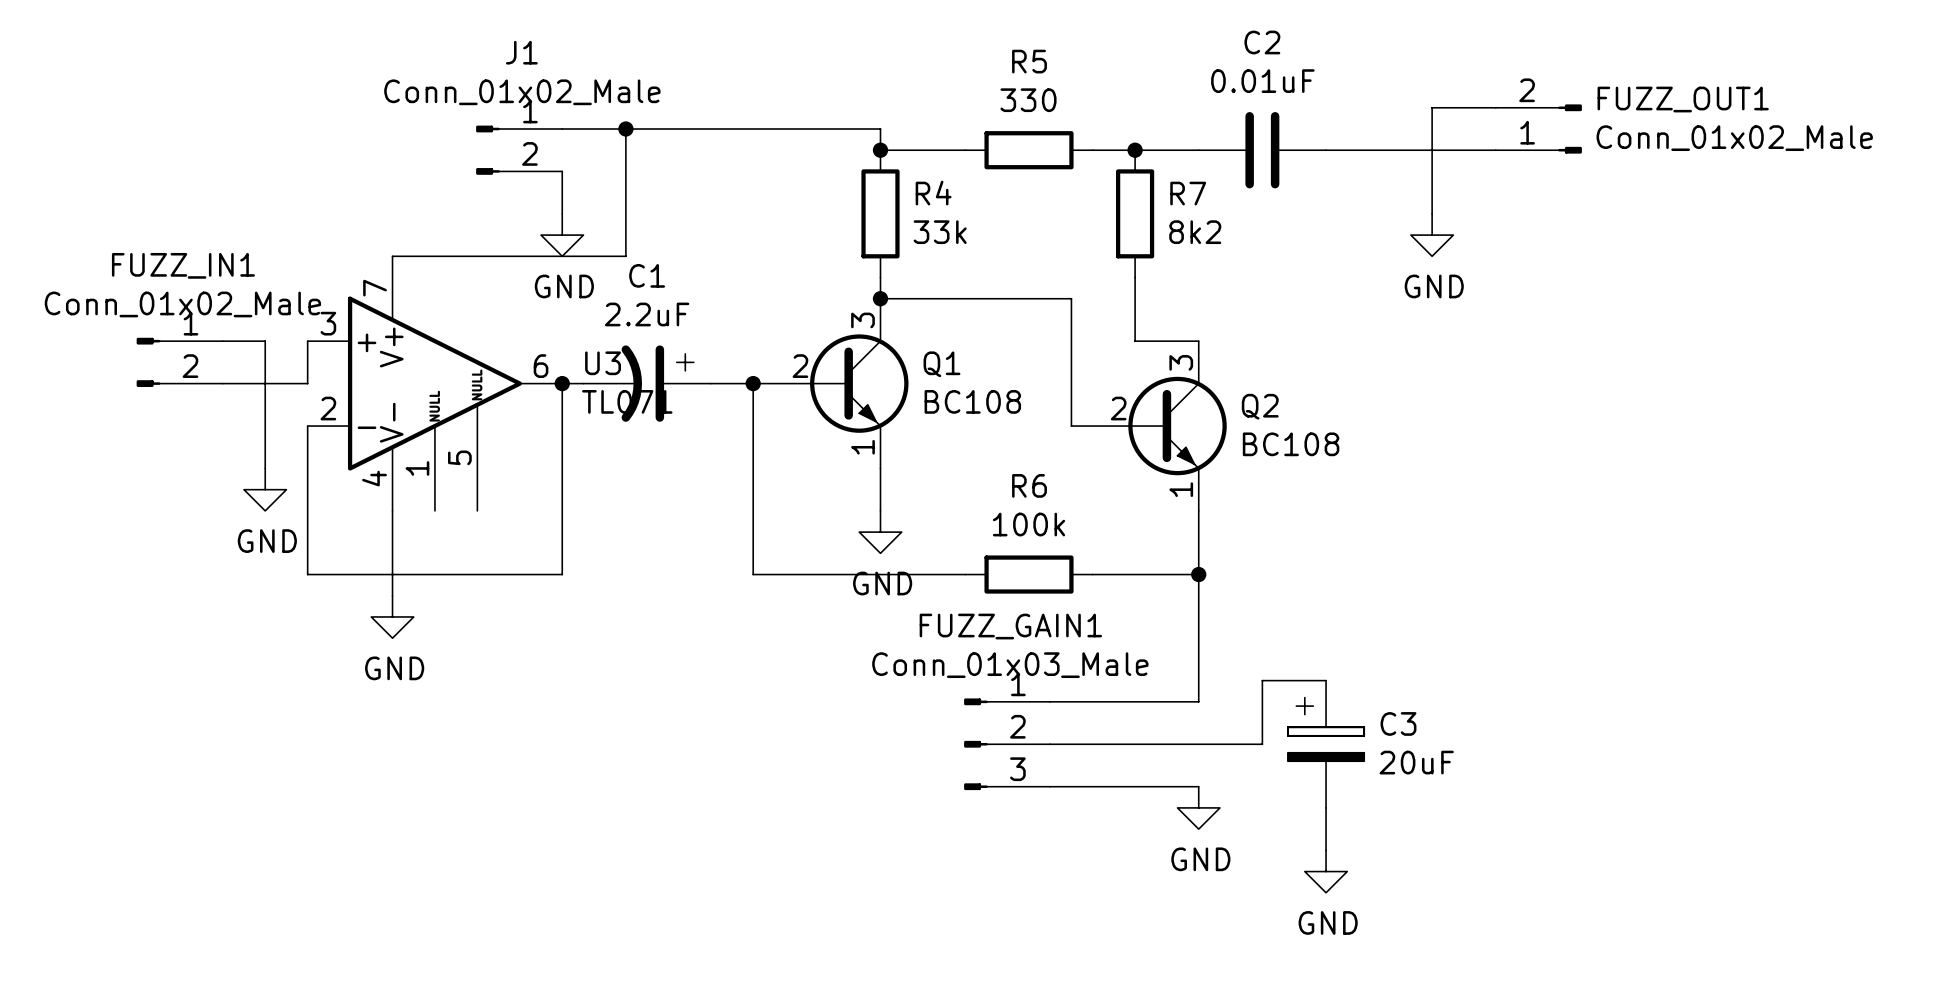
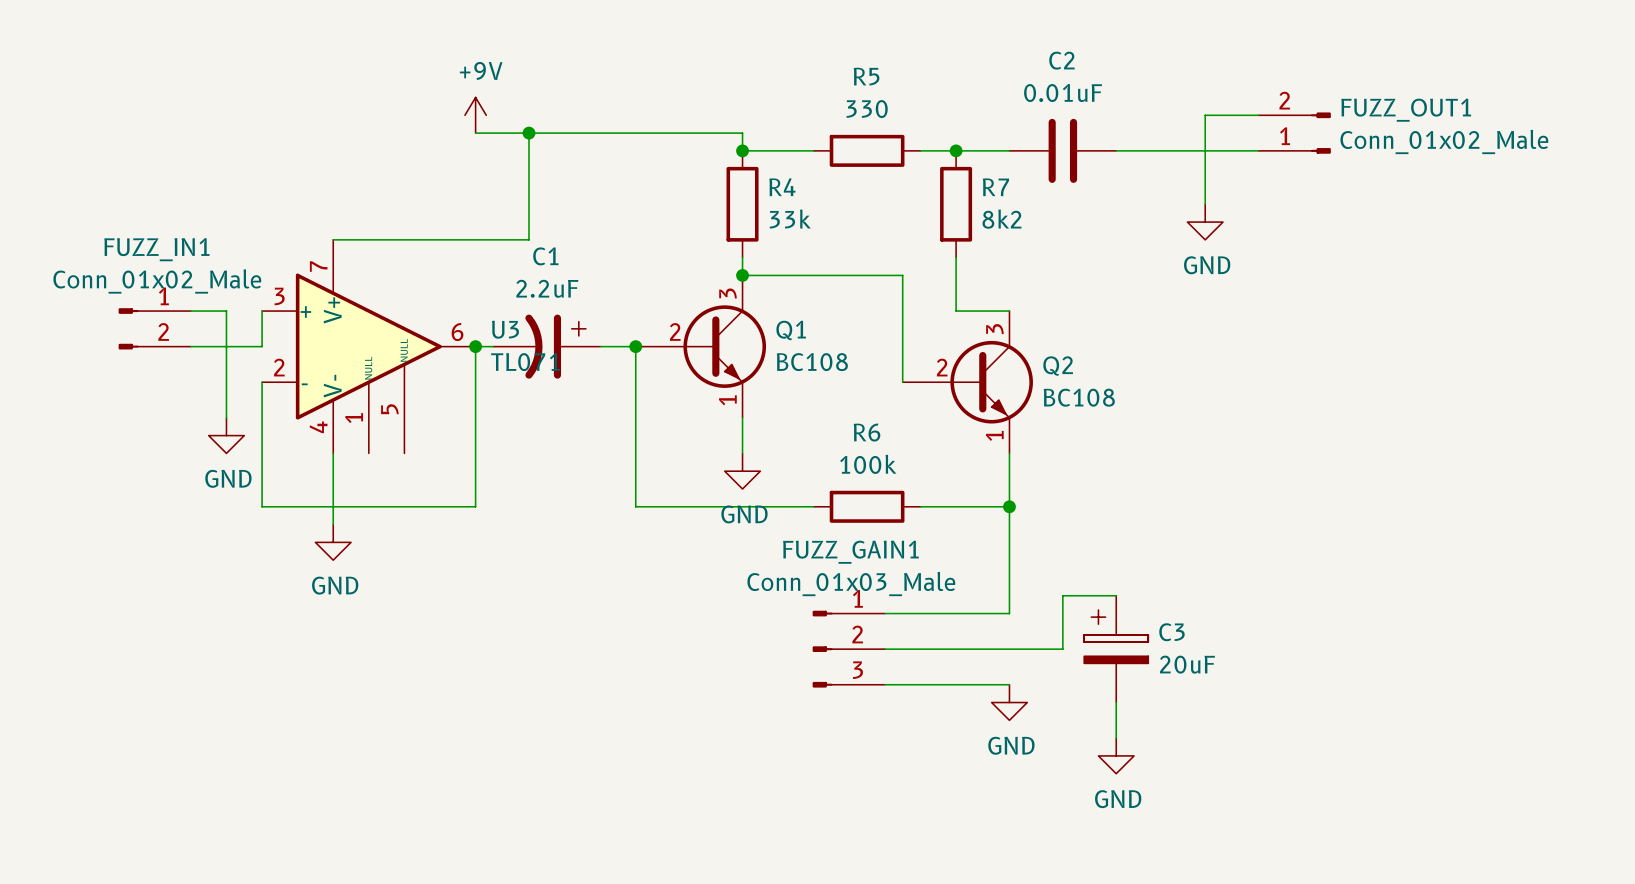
power symbol: none -> +9V (475, 115)
J1: Conn_01x02_Male (519, 150) -> none
wire: (562, 171) (562, 213) -> none
power symbol: GND (562, 235) -> none

